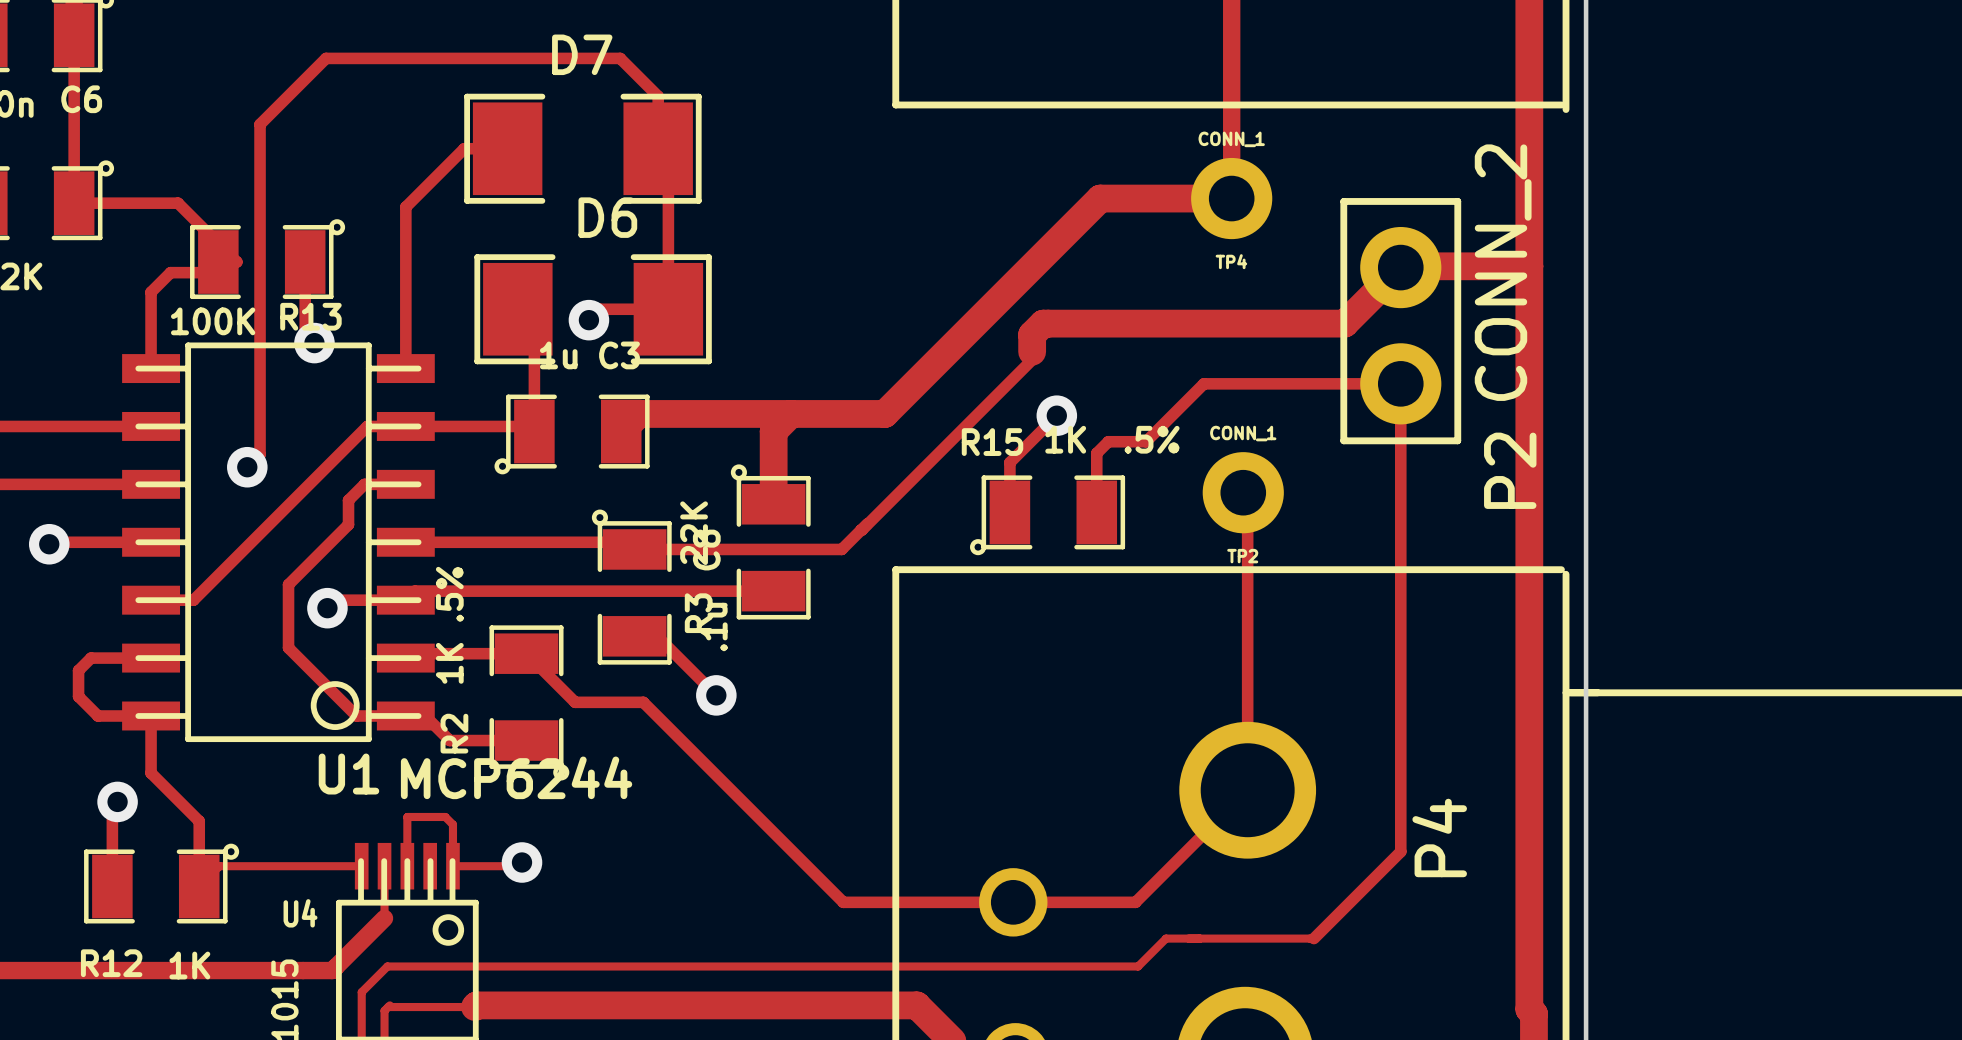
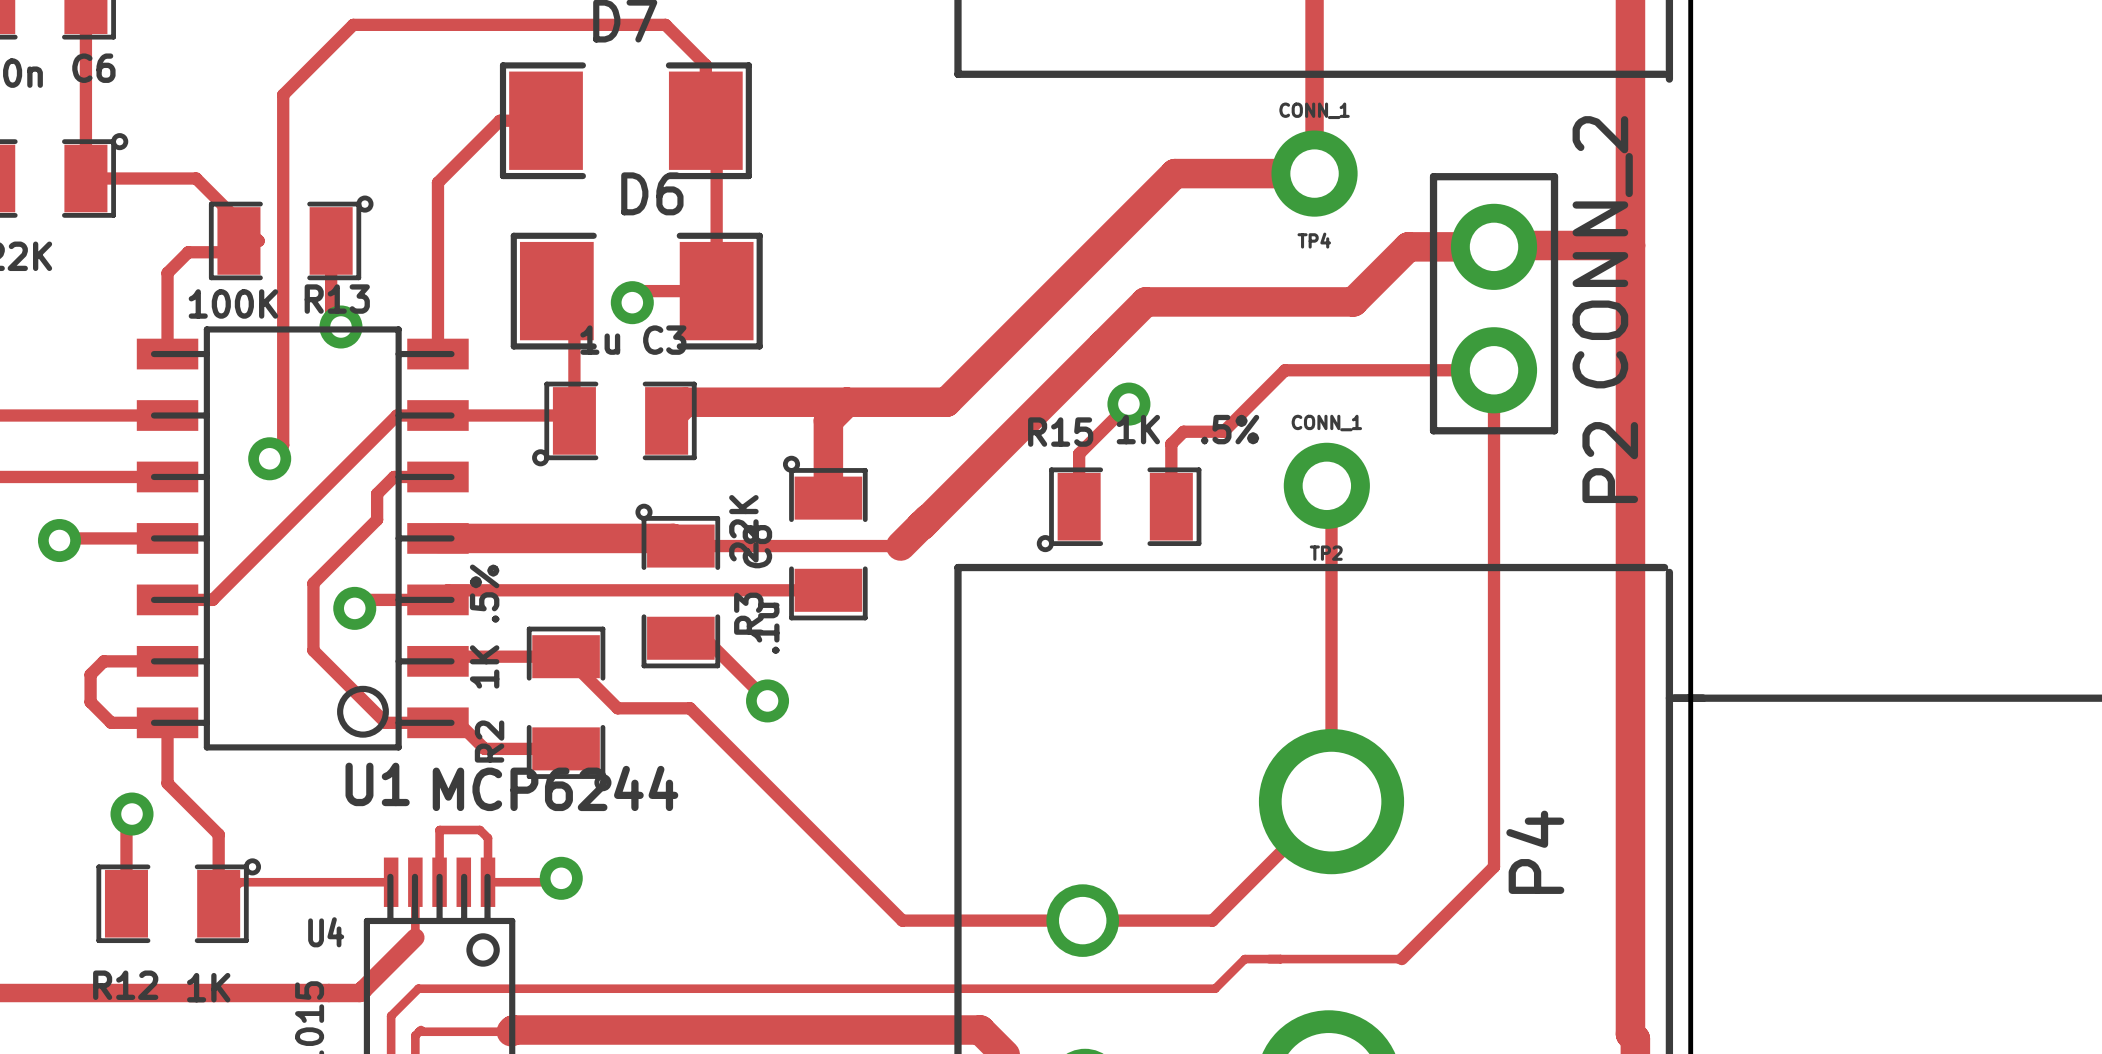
track: (1400, 267) (1344, 323) (1043, 323) (1032, 334) (1032, 351) -> (1494, 246) (1408, 246) (1353, 301) (1145, 301) (1103, 344)
track width: thin (1032, 359) (861, 530) -> thick (1103, 344) (922, 525)
track width: thin (867, 523) (841, 549) -> thick (927, 518) (900, 546)
track width: thin (405, 542) (627, 542) (634, 549) -> thick (437, 538) (673, 538) (680, 546)

